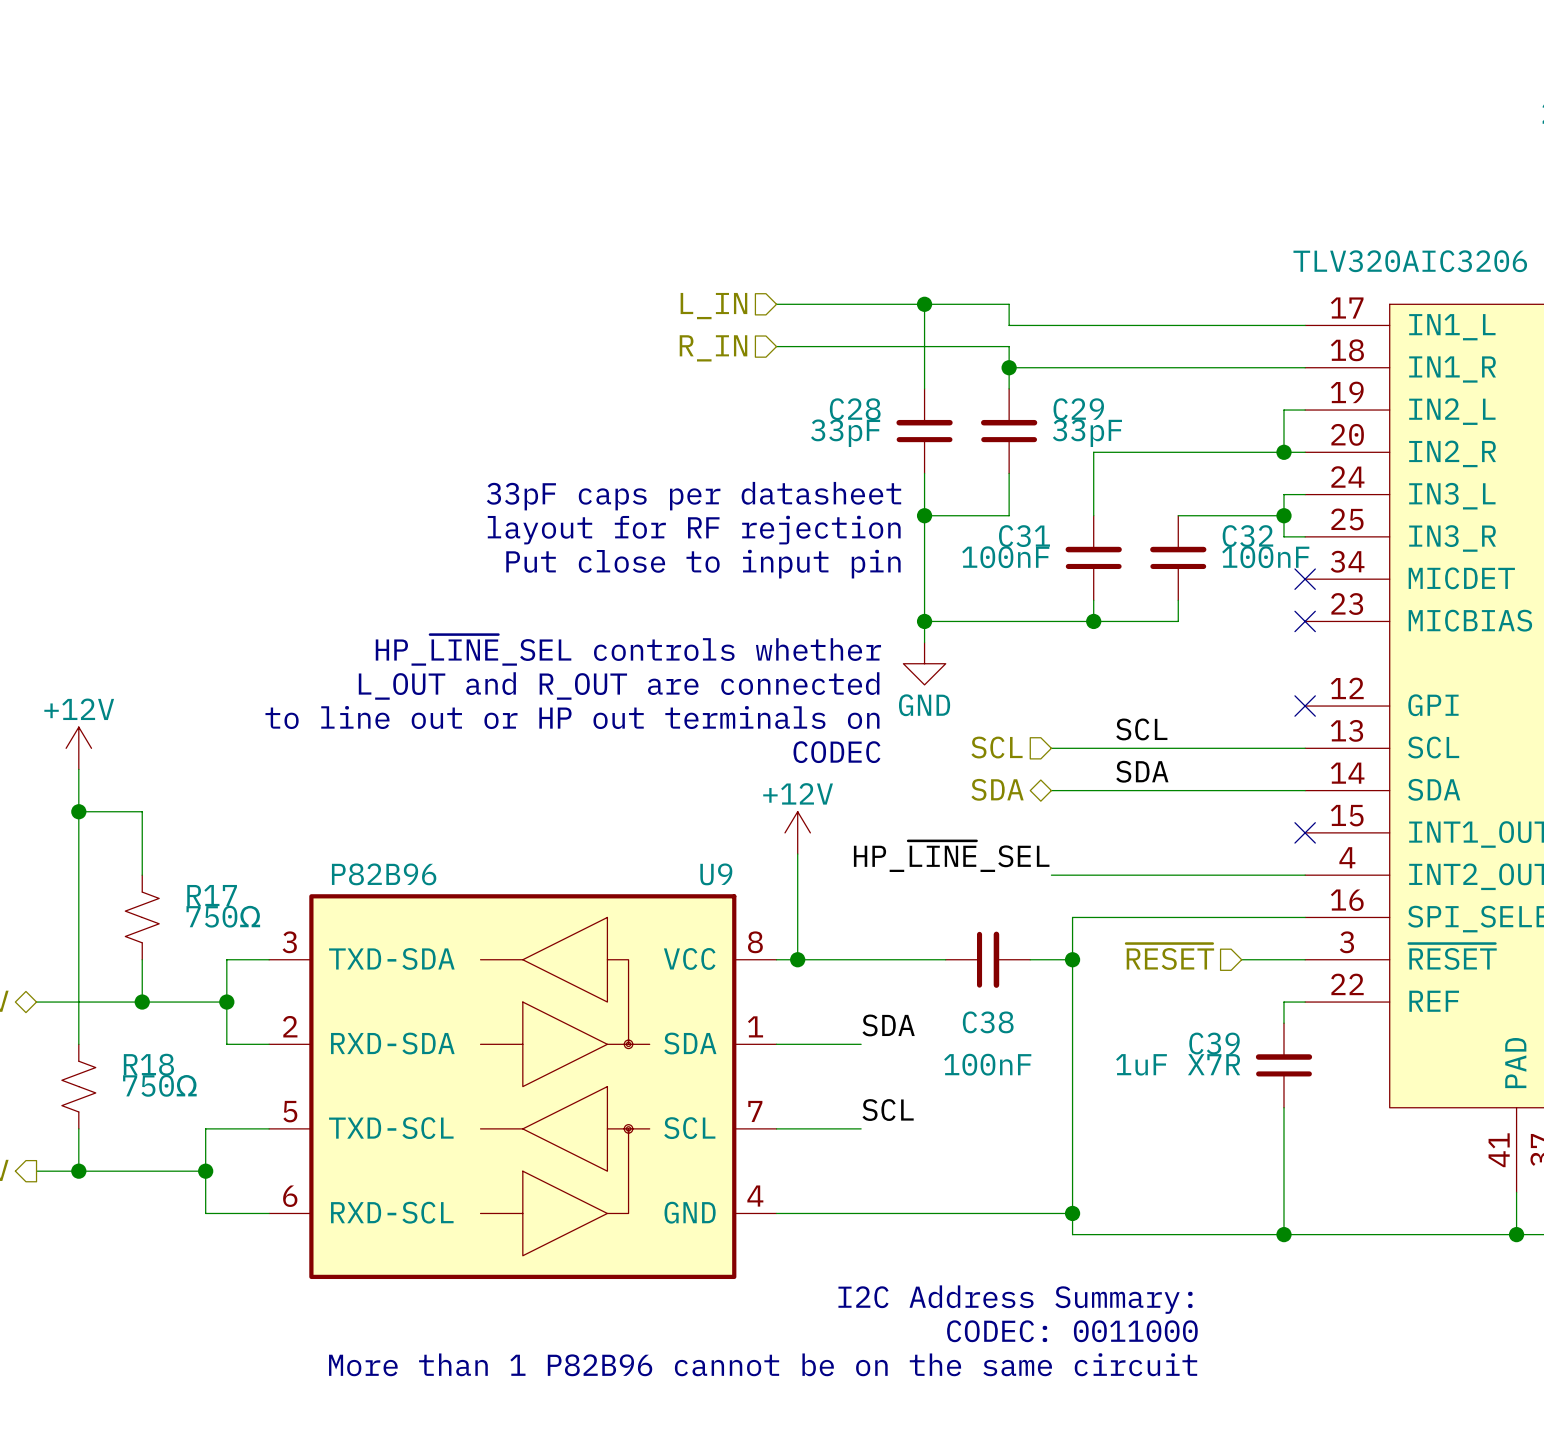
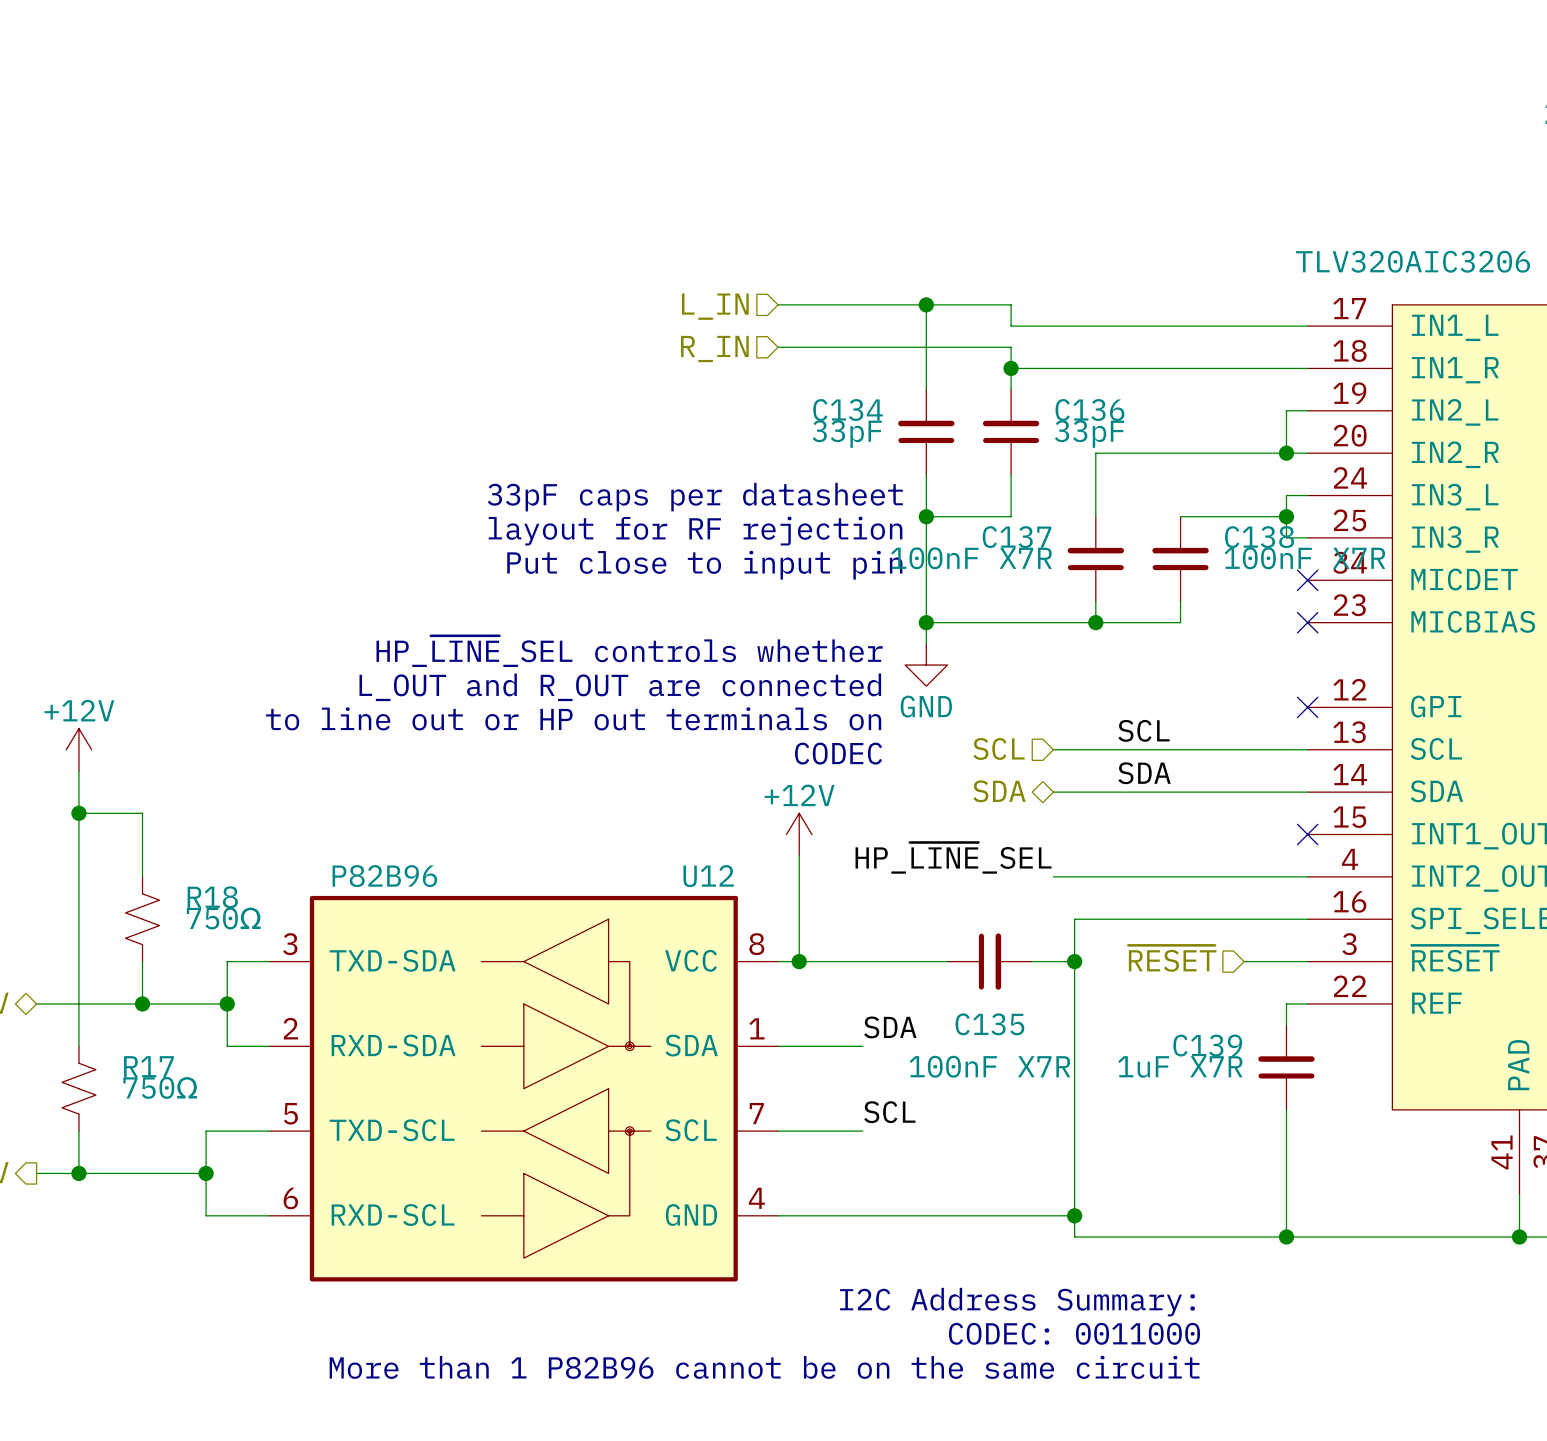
C28 name: C28 (855, 409) -> C134 (848, 410)
C29 name: C29 (1078, 409) -> C136 (1089, 410)
C31 name: C31 (1024, 536) -> C137 (1017, 537)
C32 name: C32 (1247, 536) -> C138 (1259, 537)
C31 value: 100nF (1005, 557) -> 100nF X7R (971, 558)
C32 value: 100nF (1265, 557) -> 100nF X7R (1304, 558)
U9 name: U9 (716, 874) -> U12 (708, 876)
R17 name: R17 (212, 895) -> R18 (212, 897)
C38 name: C38 (988, 1022) -> C135 (989, 1024)
C39 name: C39 (1214, 1043) -> C139 (1207, 1045)
R18 name: R18 (148, 1064) -> R17 (148, 1066)
C38 value: 100nF (987, 1064) -> 100nF X7R (989, 1066)

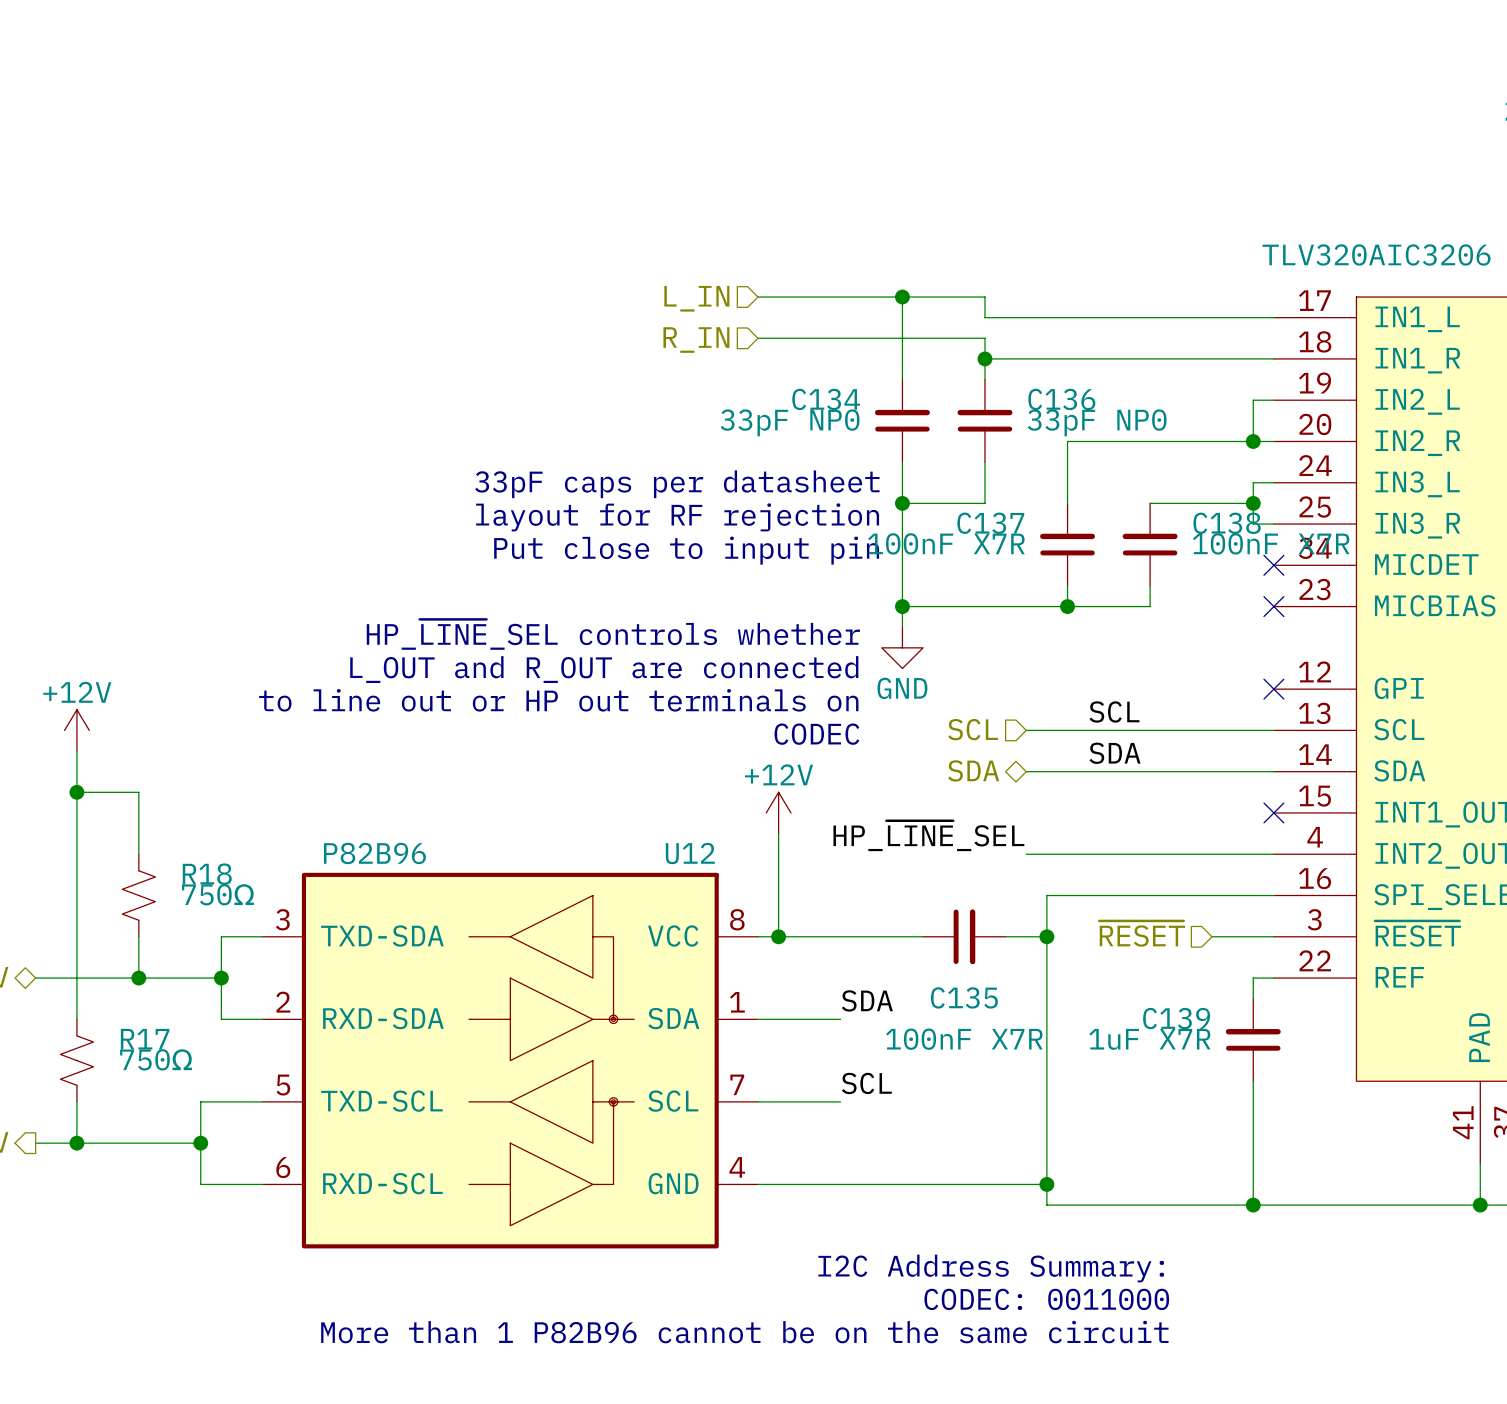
C134 value: 33pF (847, 434) -> 33pF NP0 (790, 422)
C136 value: 33pF (1089, 434) -> 33pF NP0 (1097, 422)

